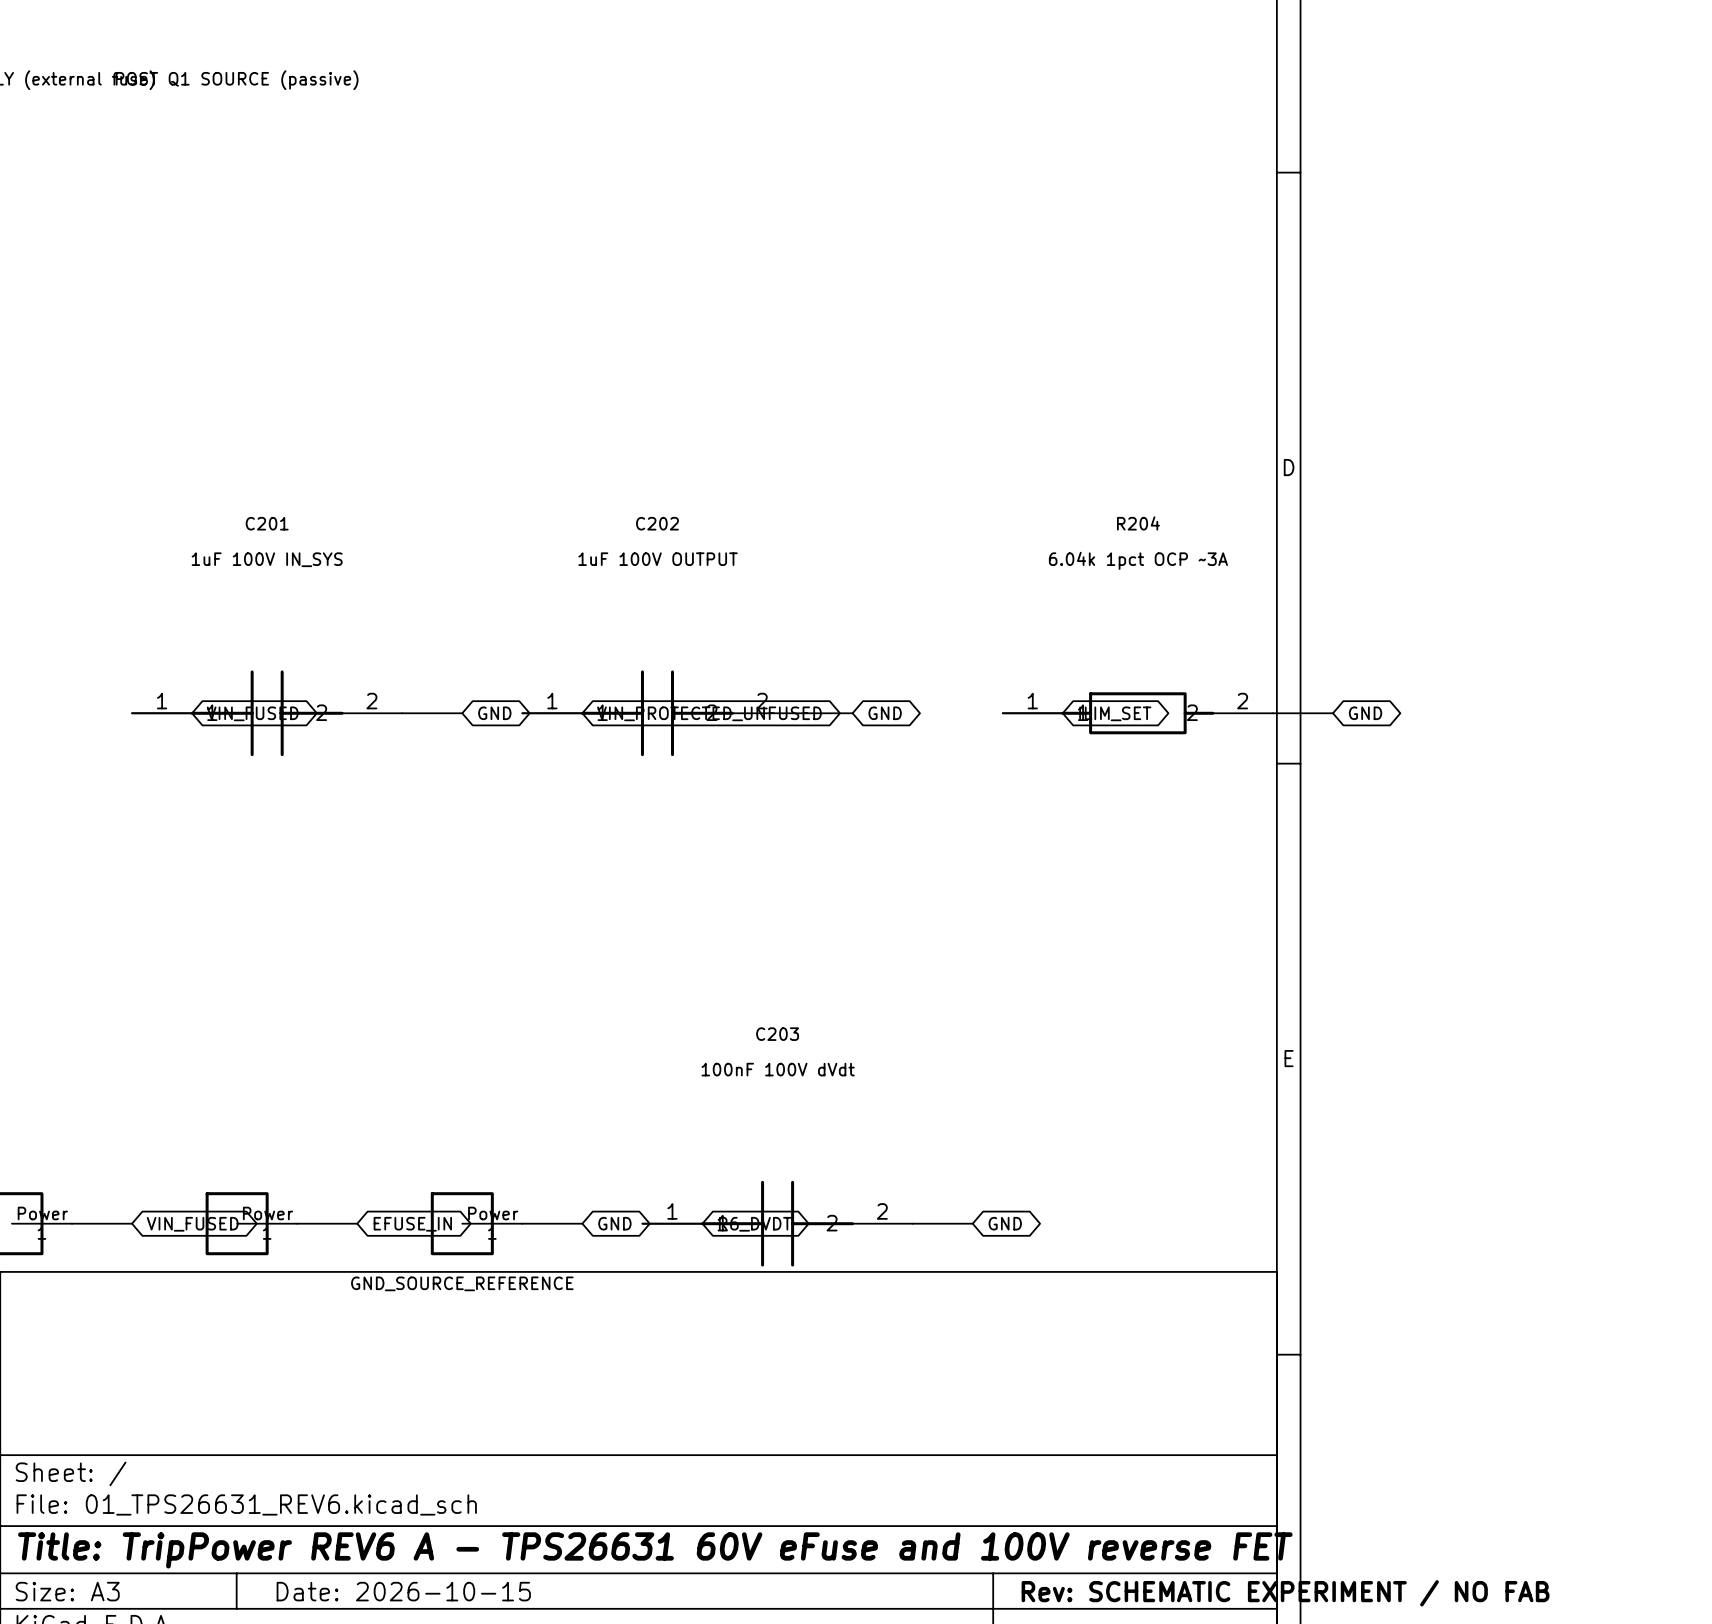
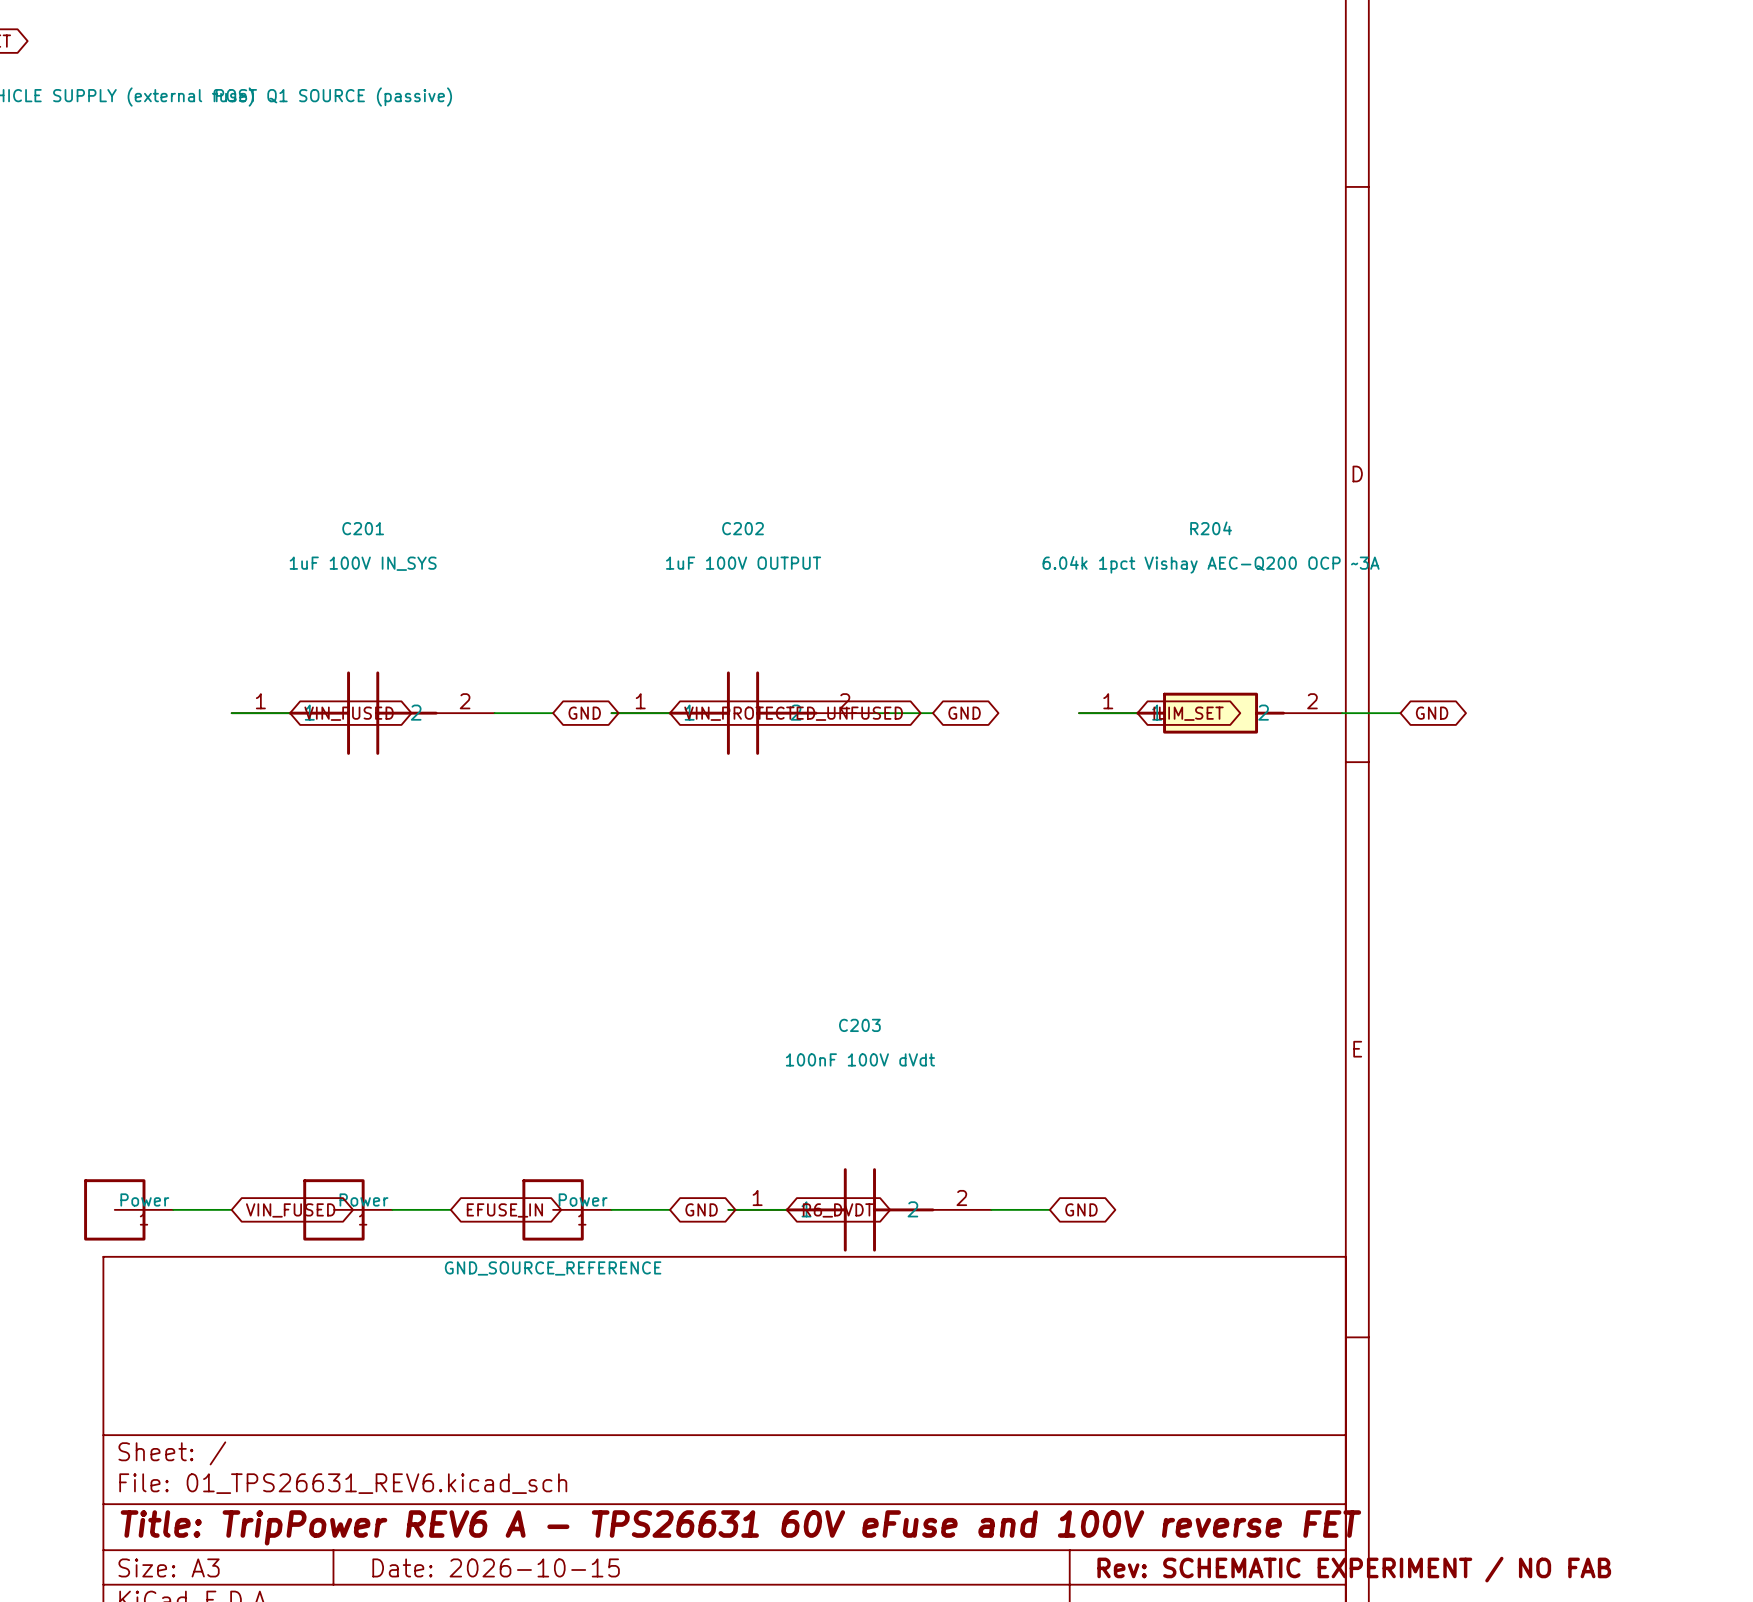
R204 value: 6.04k 1pct OCP ~3A (1138, 560) -> 6.04k 1pct Vishay AEC-Q200 OCP ~3A (1211, 564)

